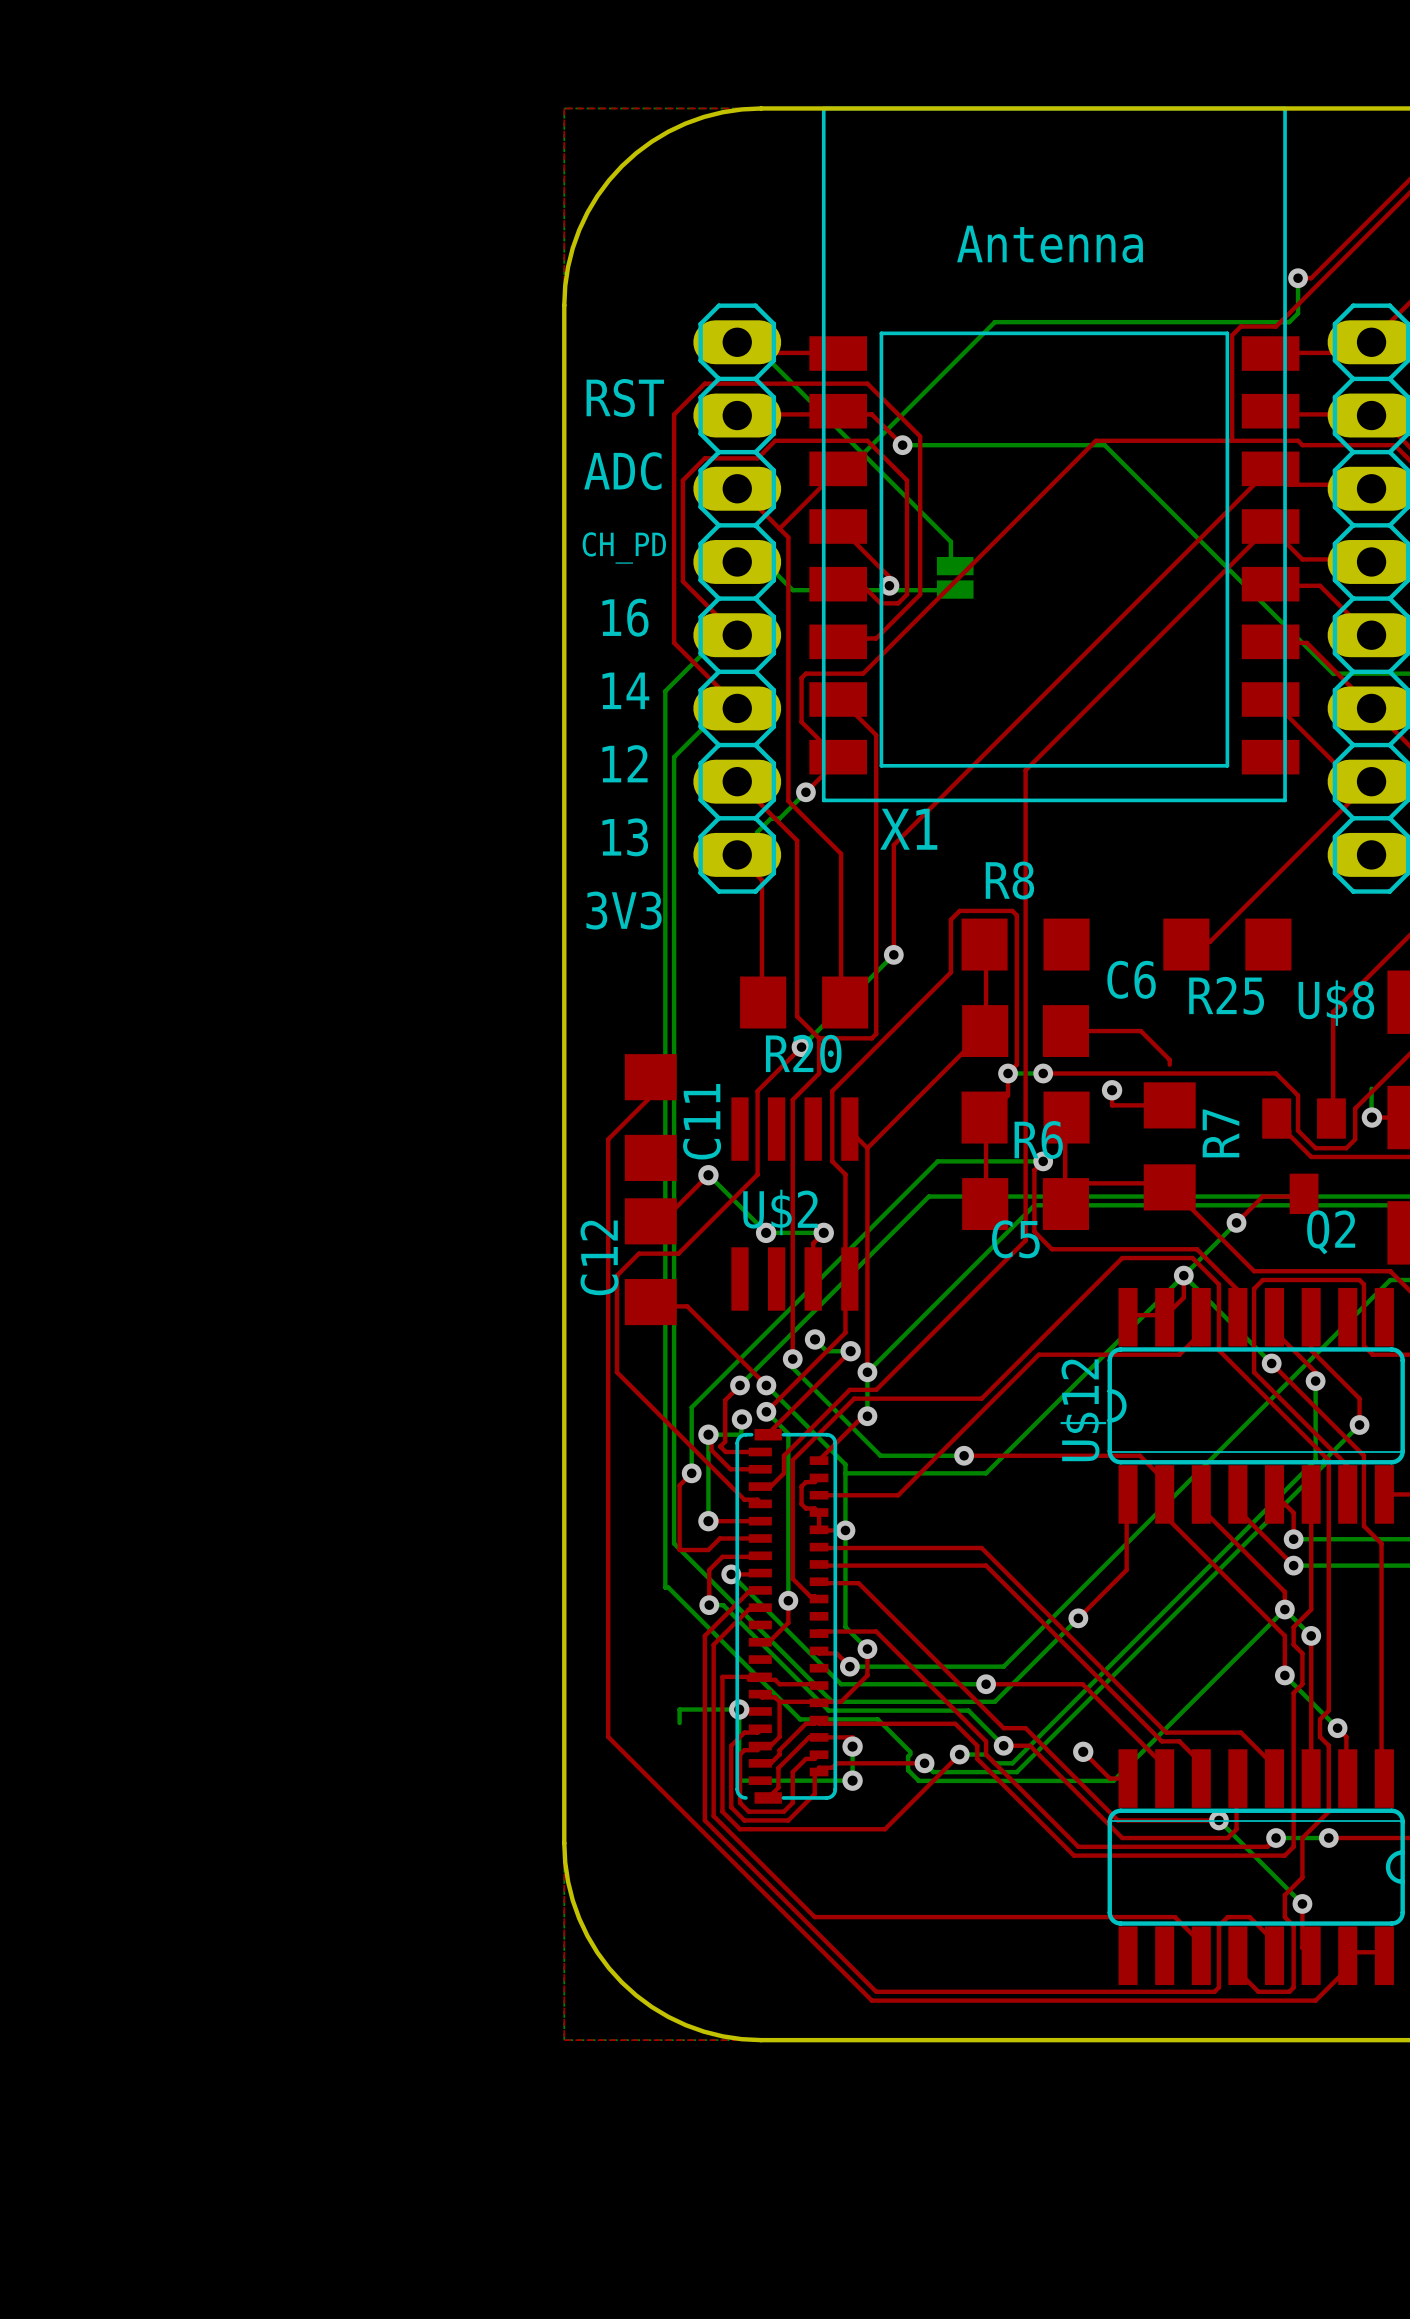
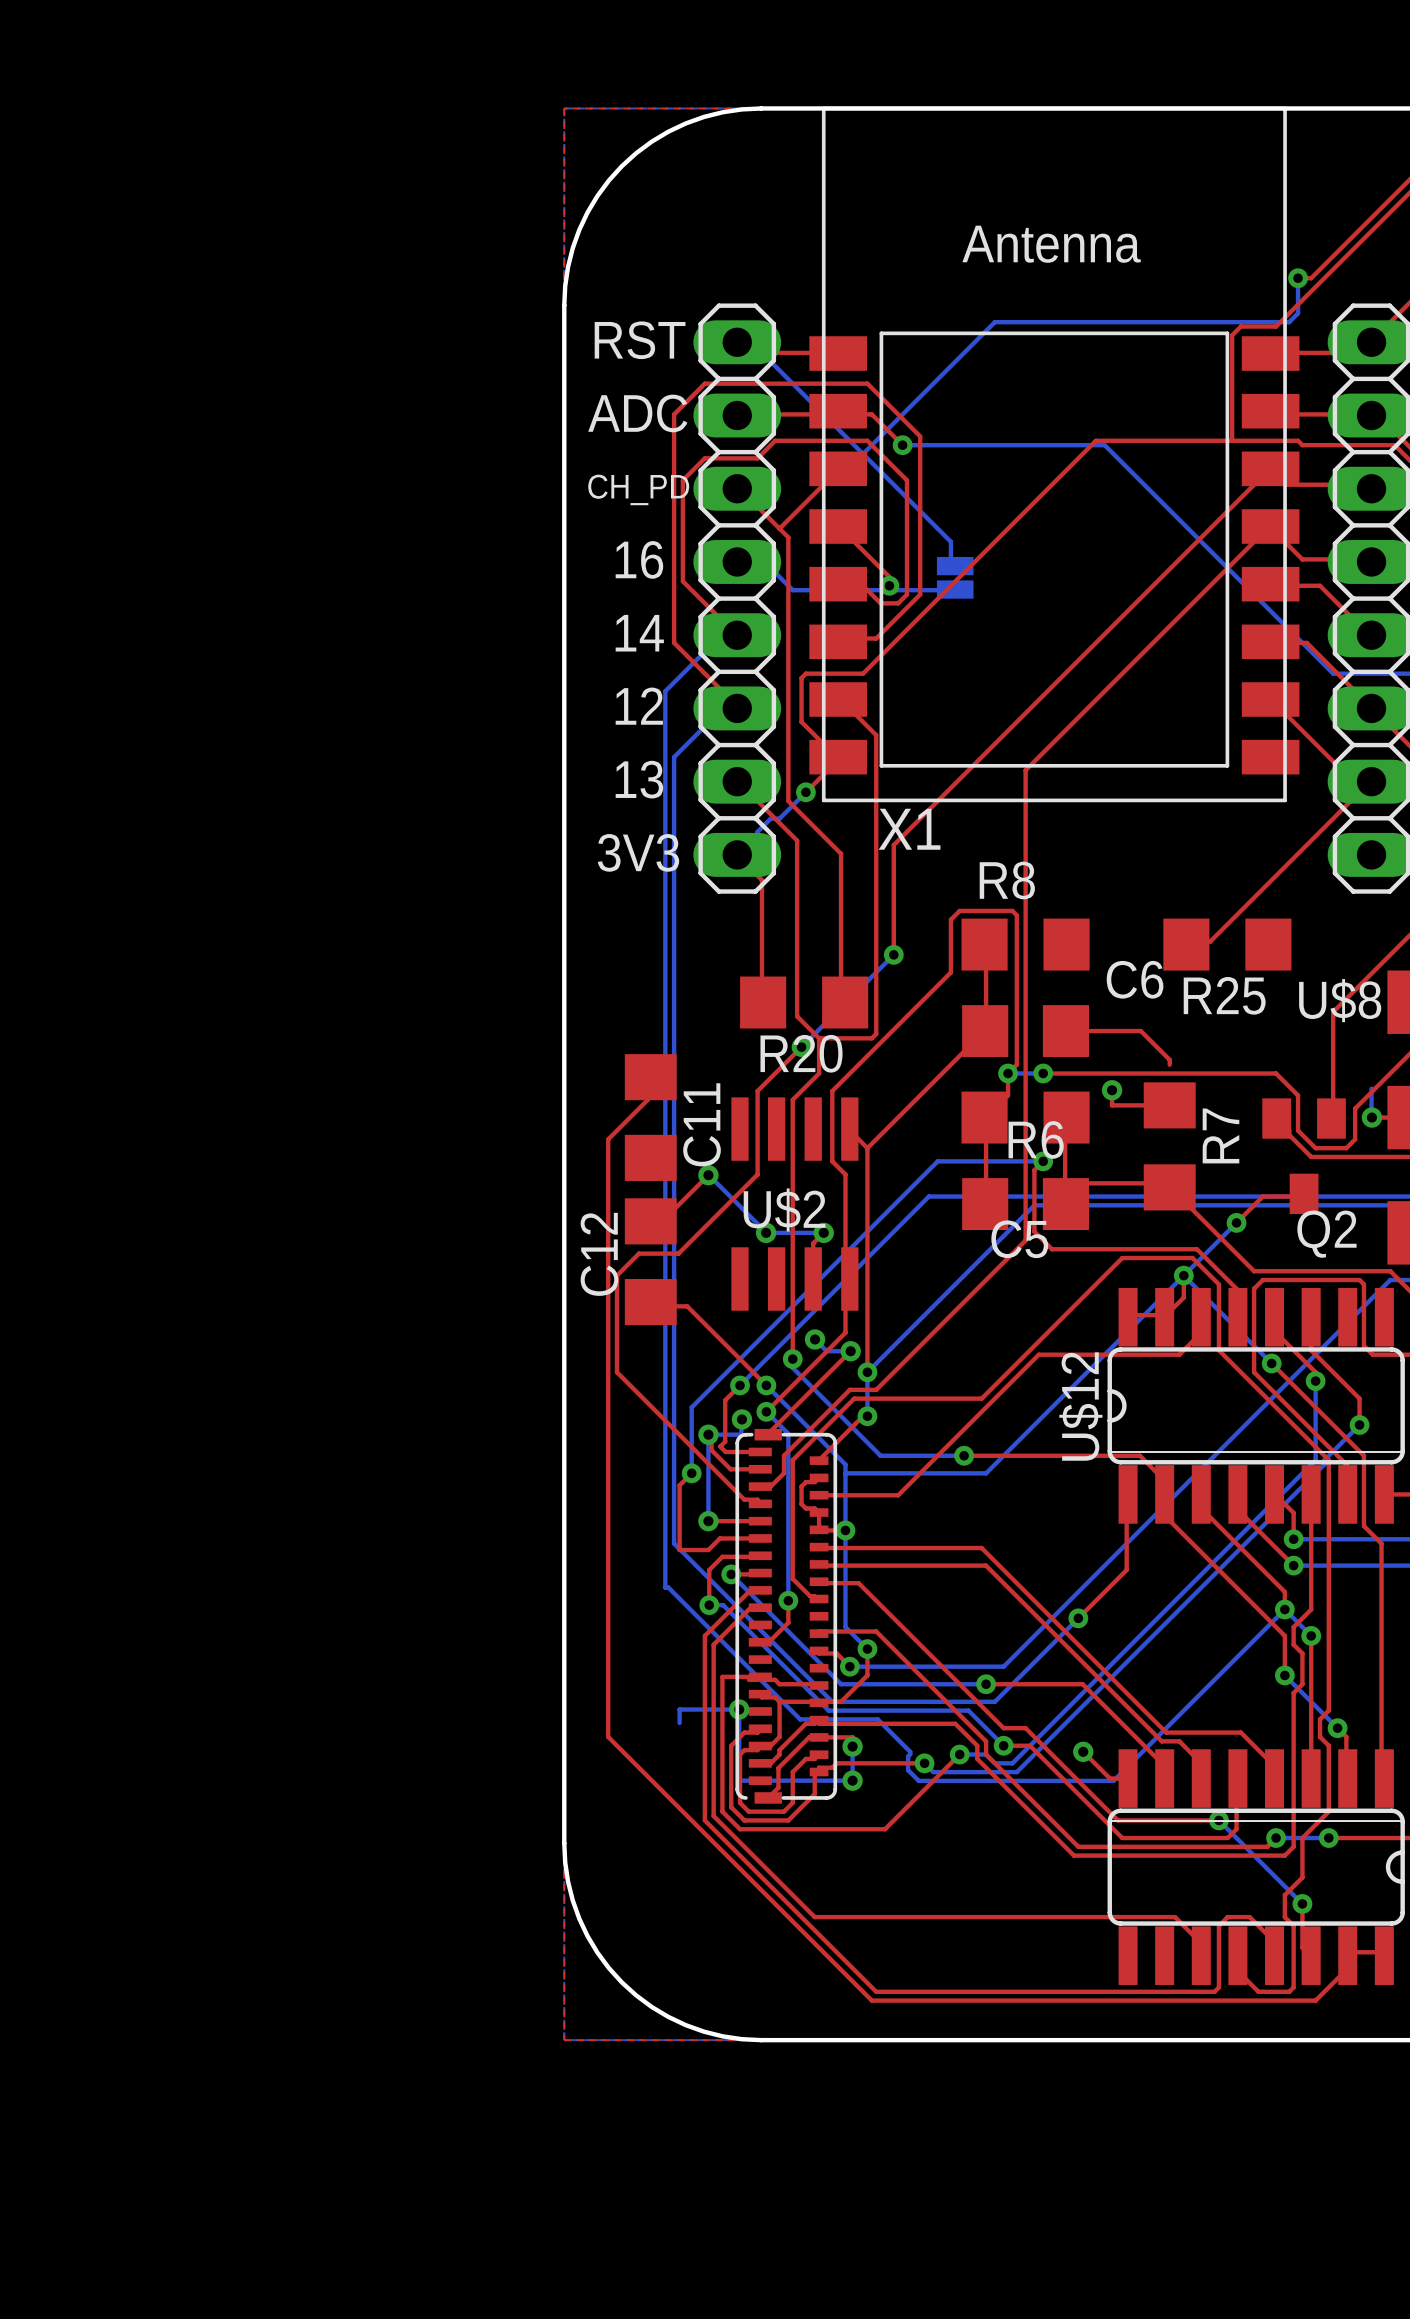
text: none -> RST (640, 340)
text: RST (625, 397) -> ADC (637, 413)
text: ADC (622, 471) -> CH_PD (638, 489)
text: CH_PD (624, 547) -> 16 (639, 559)
text: 16 (625, 617) -> 14 (639, 633)
text: 14 (625, 690) -> 12 (639, 706)
text: 12 (625, 763) -> 13 (639, 779)
text: 13 (625, 837) -> 3V3 (638, 852)
text: 3V3 (624, 910) -> none

